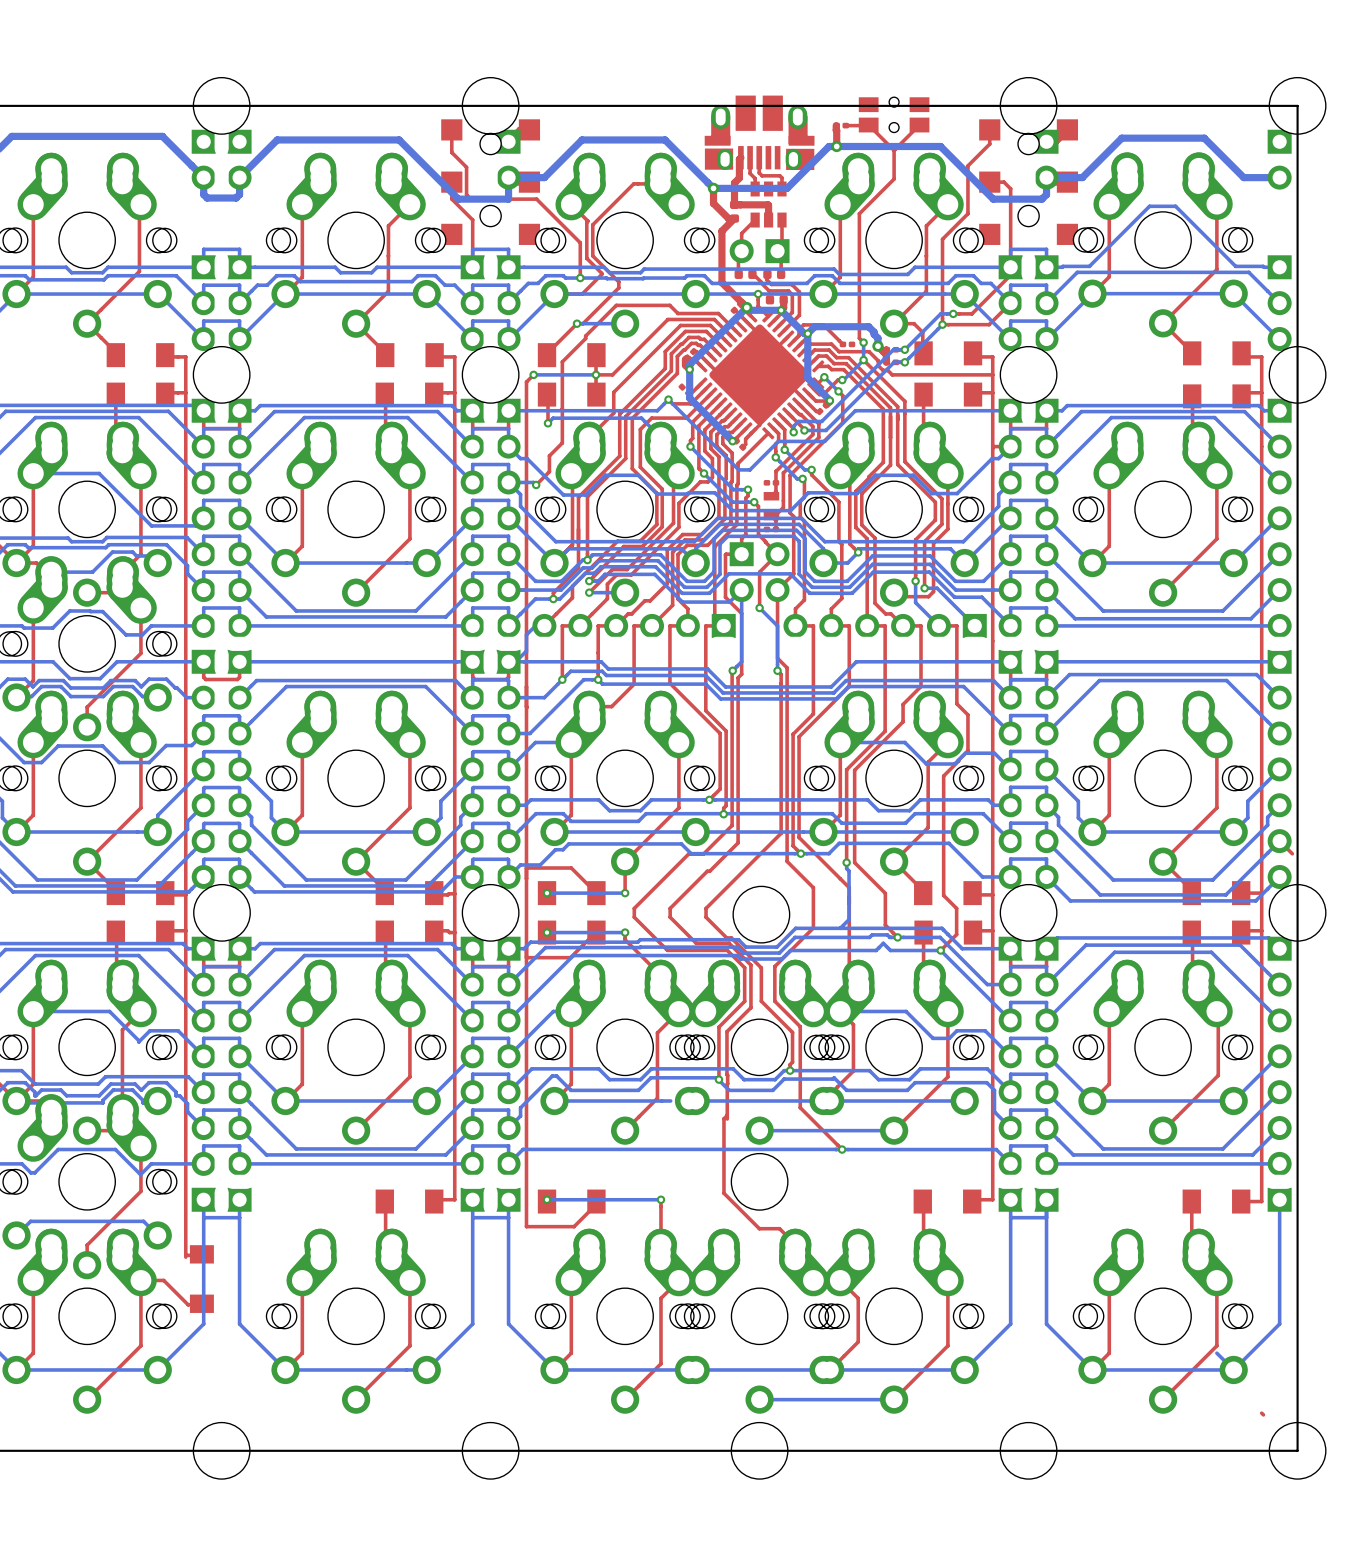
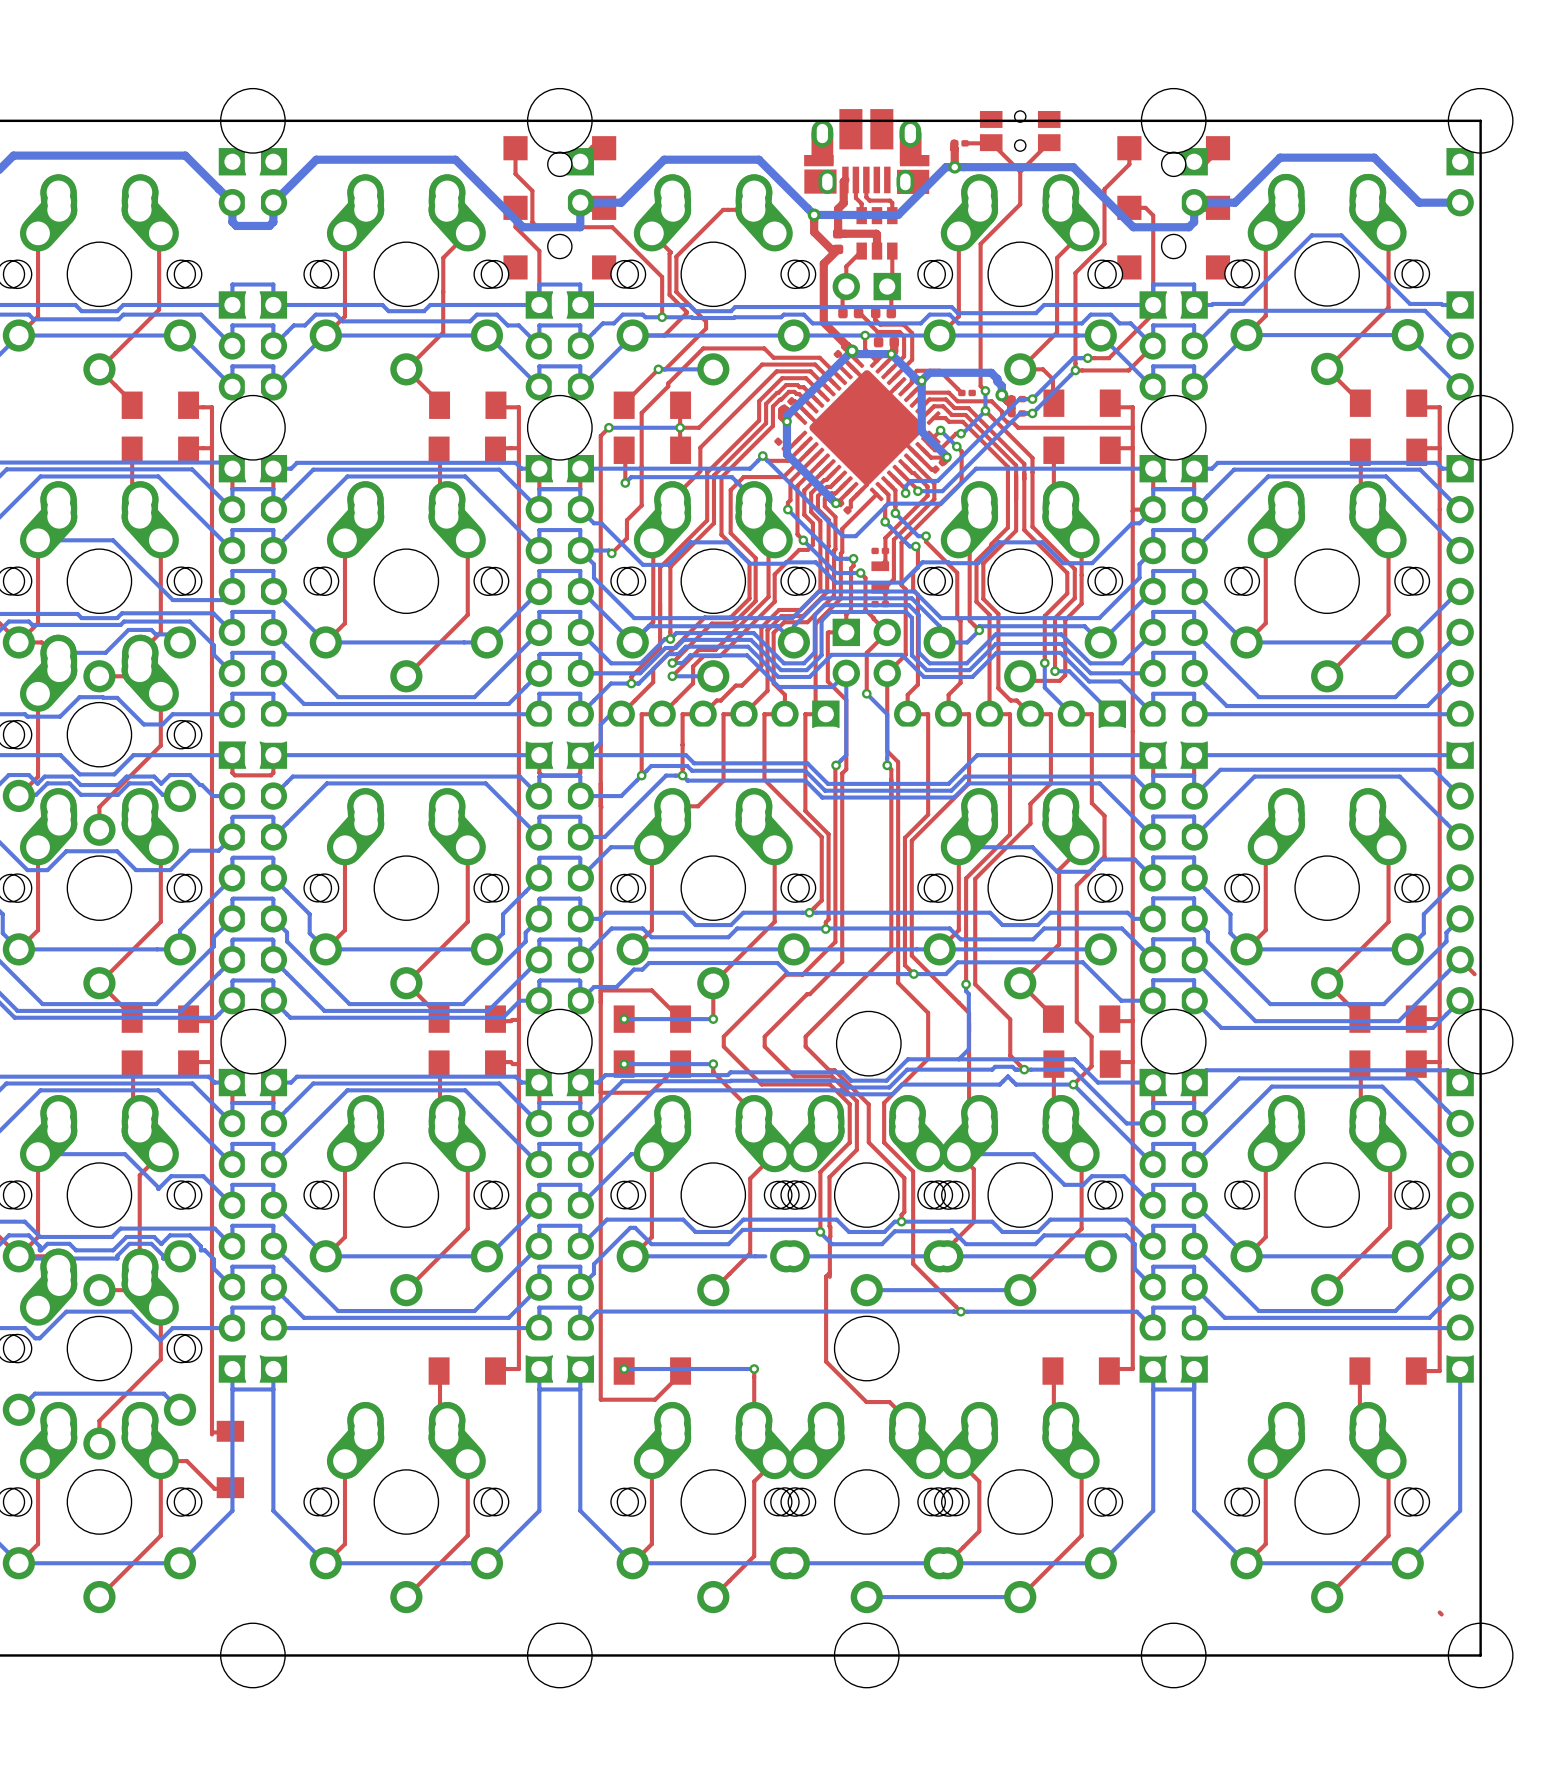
bottom track: (1216, 1353) (1233, 1369) -> none

